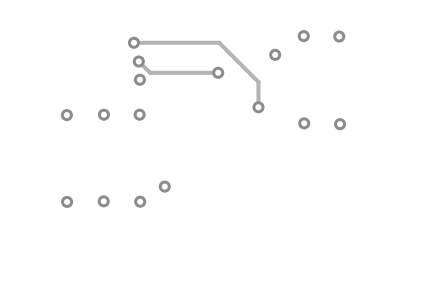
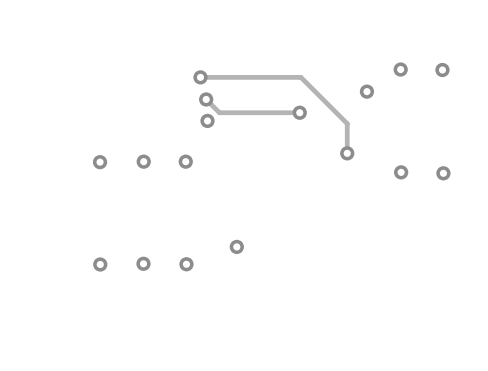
via: none -> (100, 162)
via: none -> (143, 161)
via: (103, 114) -> none
via: none -> (185, 161)
via: (139, 114) -> none
via: (66, 115) -> none
via: none -> (143, 263)
via: none -> (100, 264)
via: (67, 201) -> none
via: (103, 201) -> none
via: none -> (186, 264)
via: (140, 201) -> none

